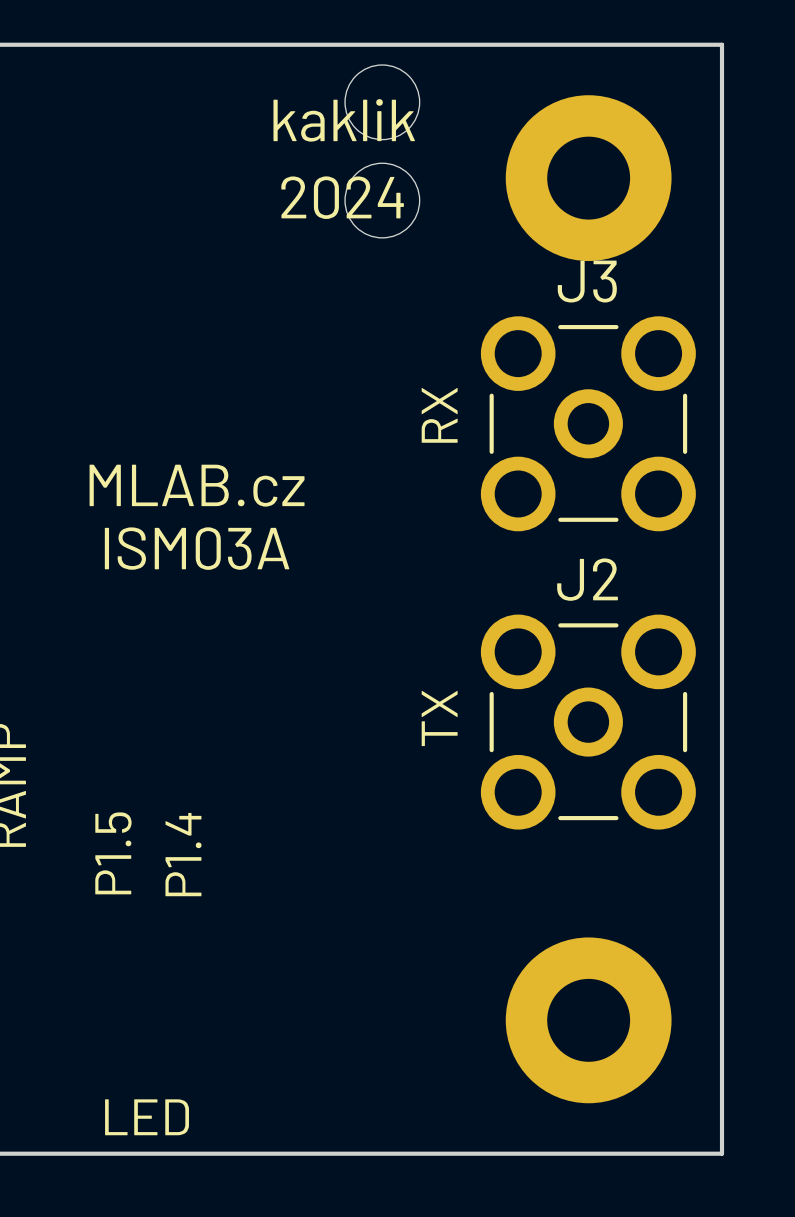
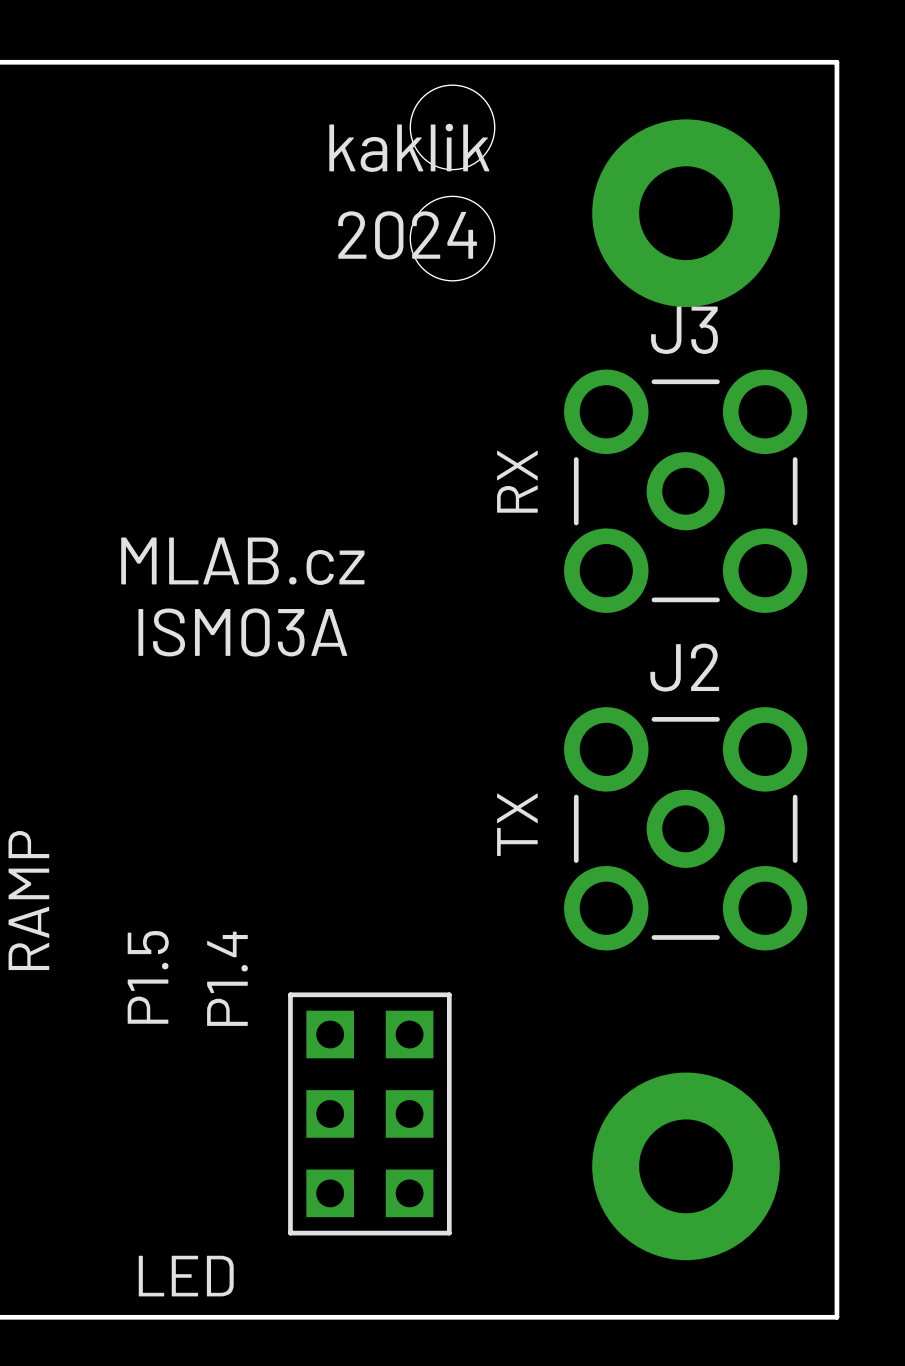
part: none -> (369, 1113)

